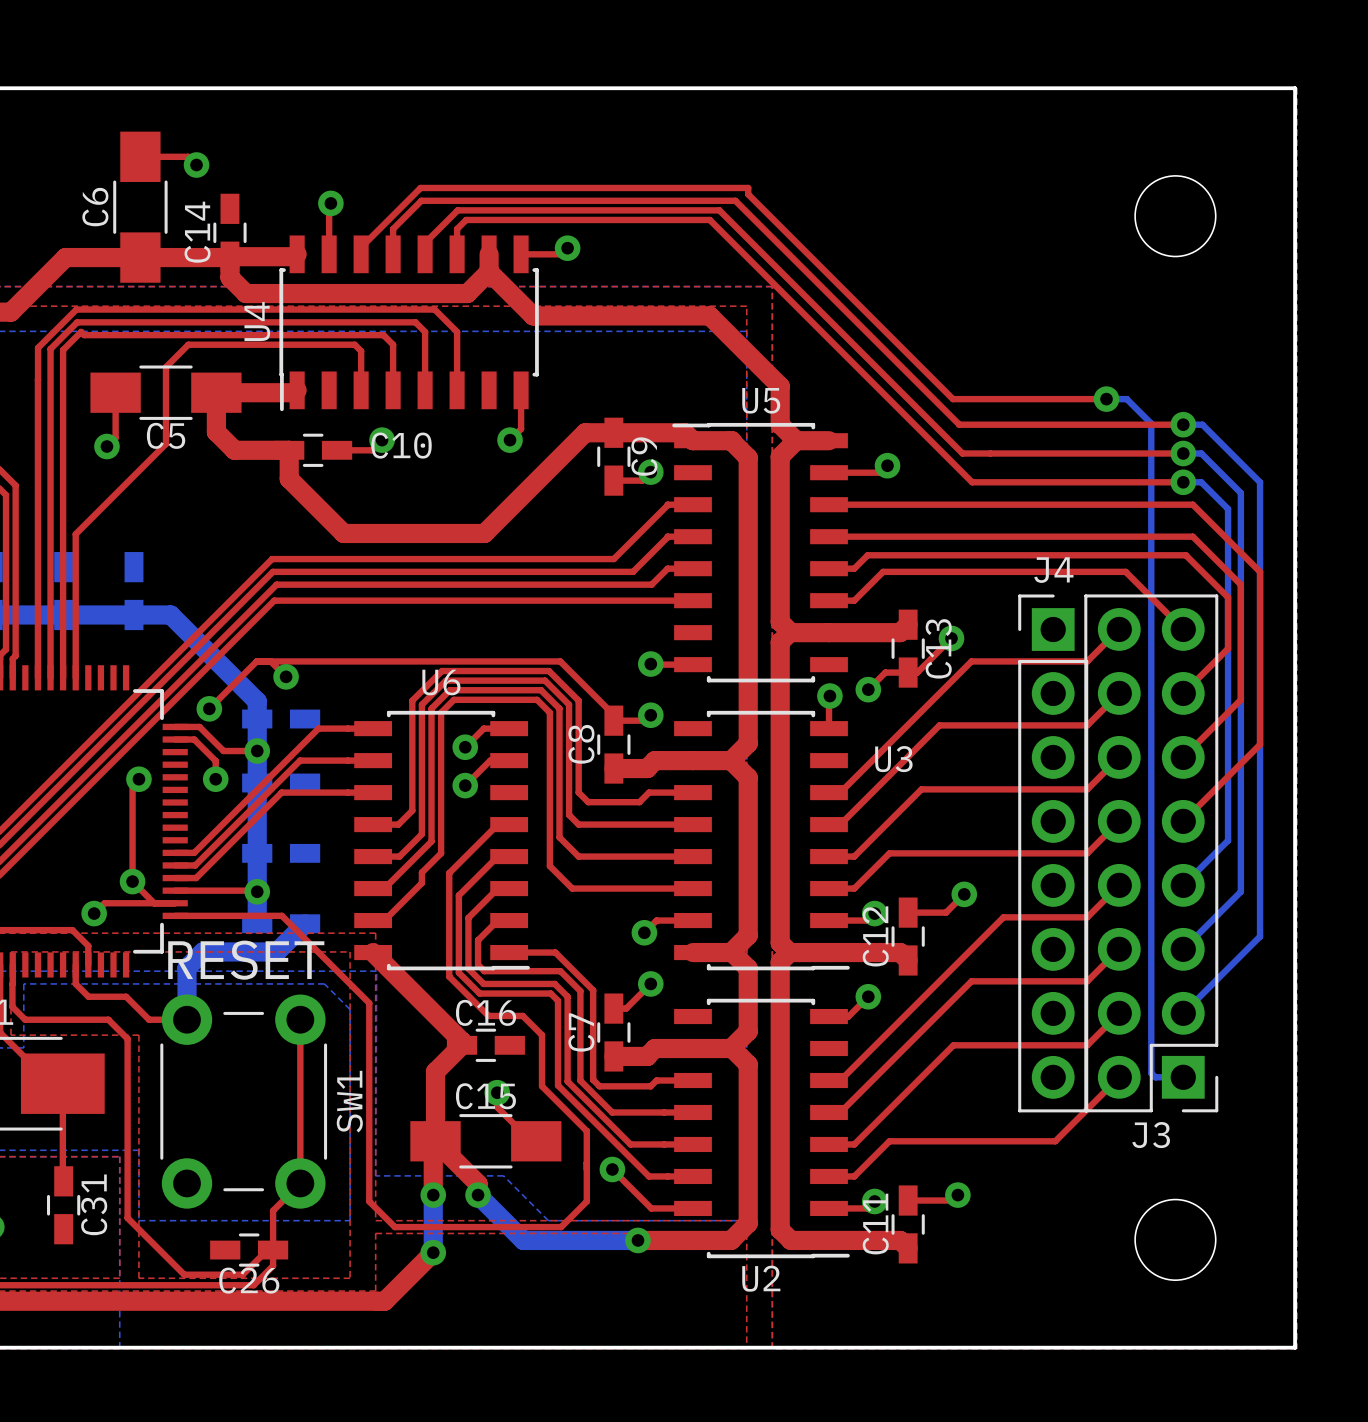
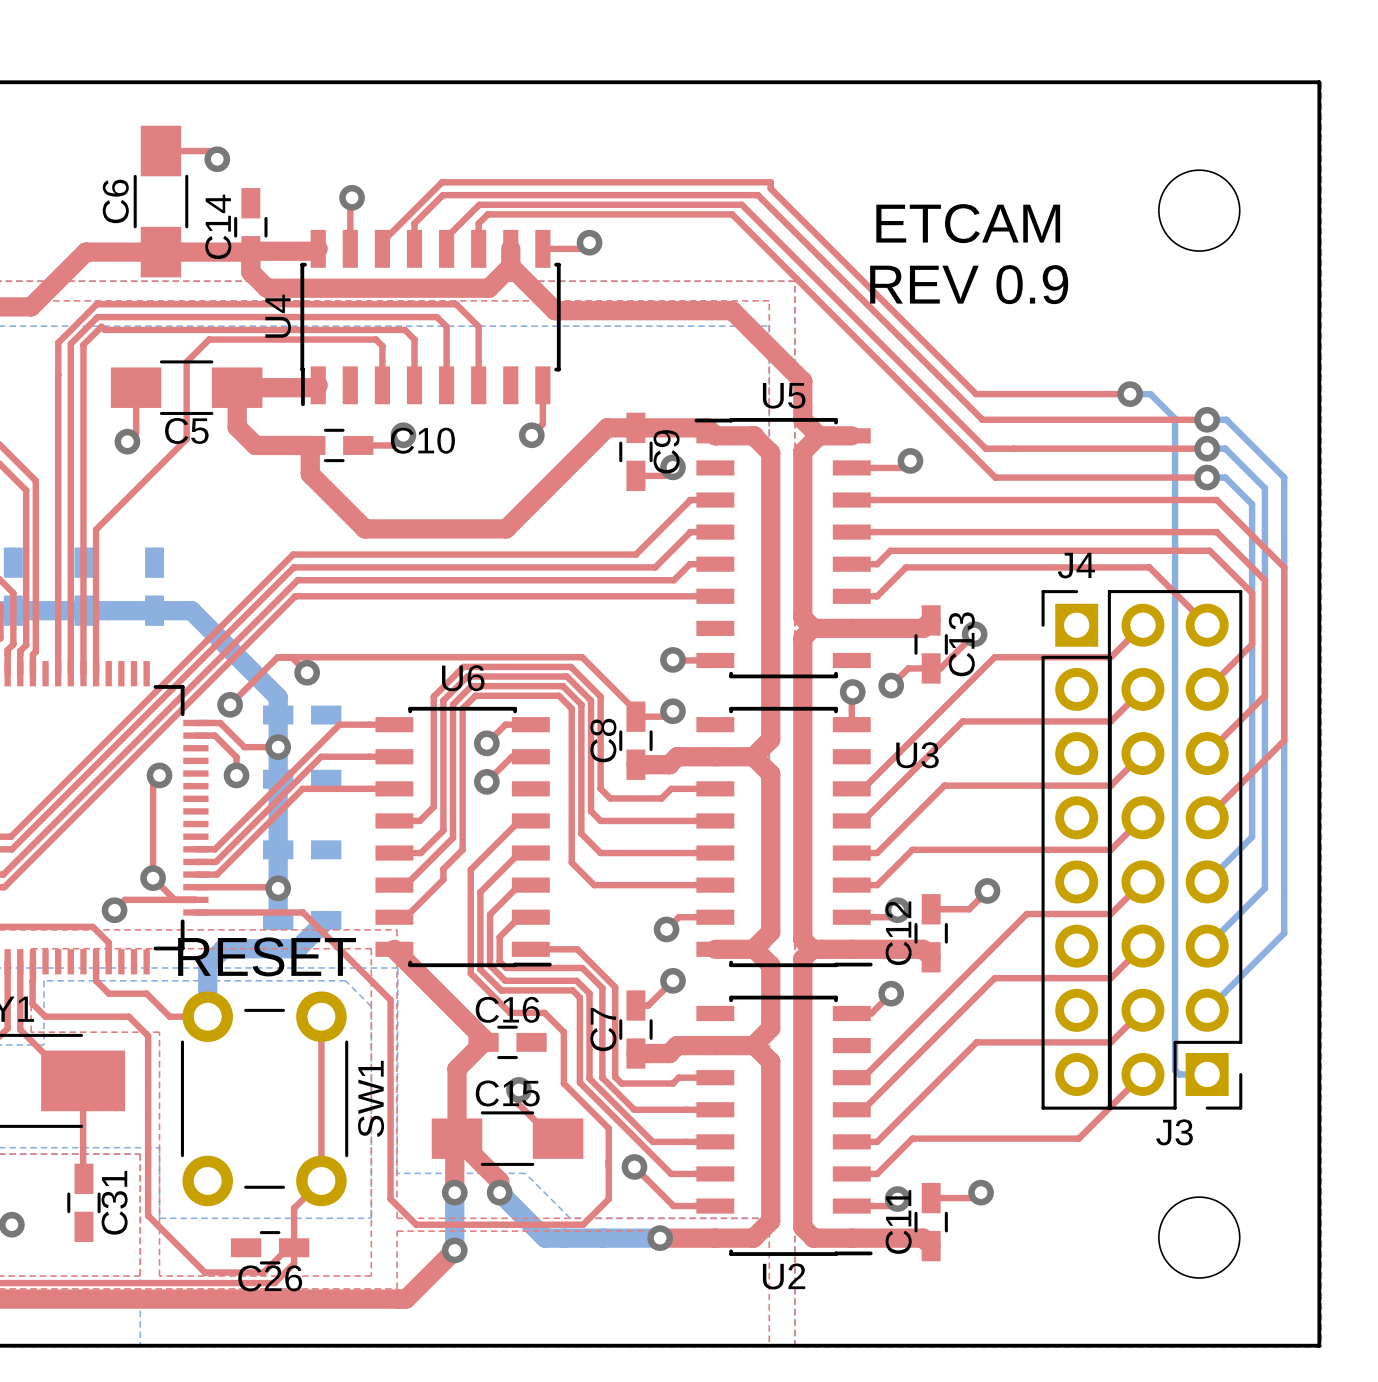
text: none -> ETCAM (968, 223)
text: none -> REV 0.9 (969, 284)

